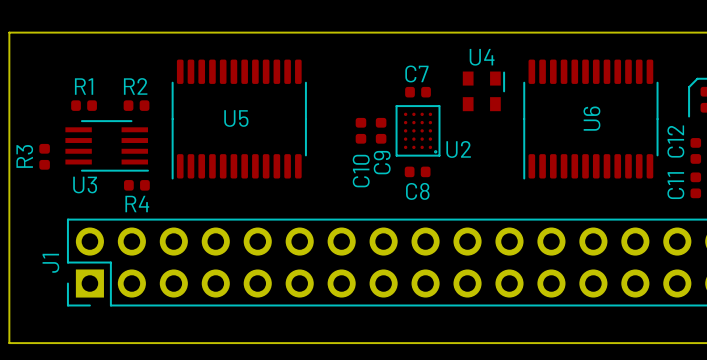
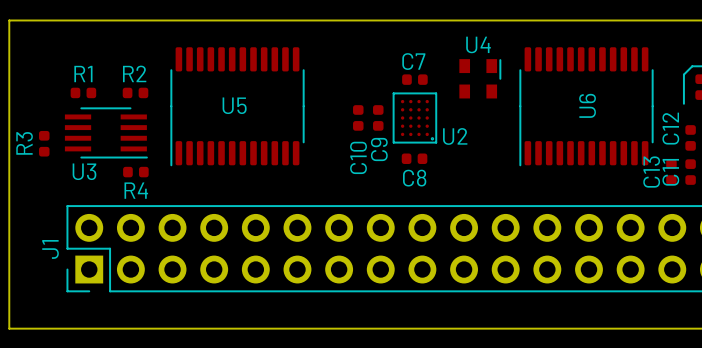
C13: none -> (671, 172)

